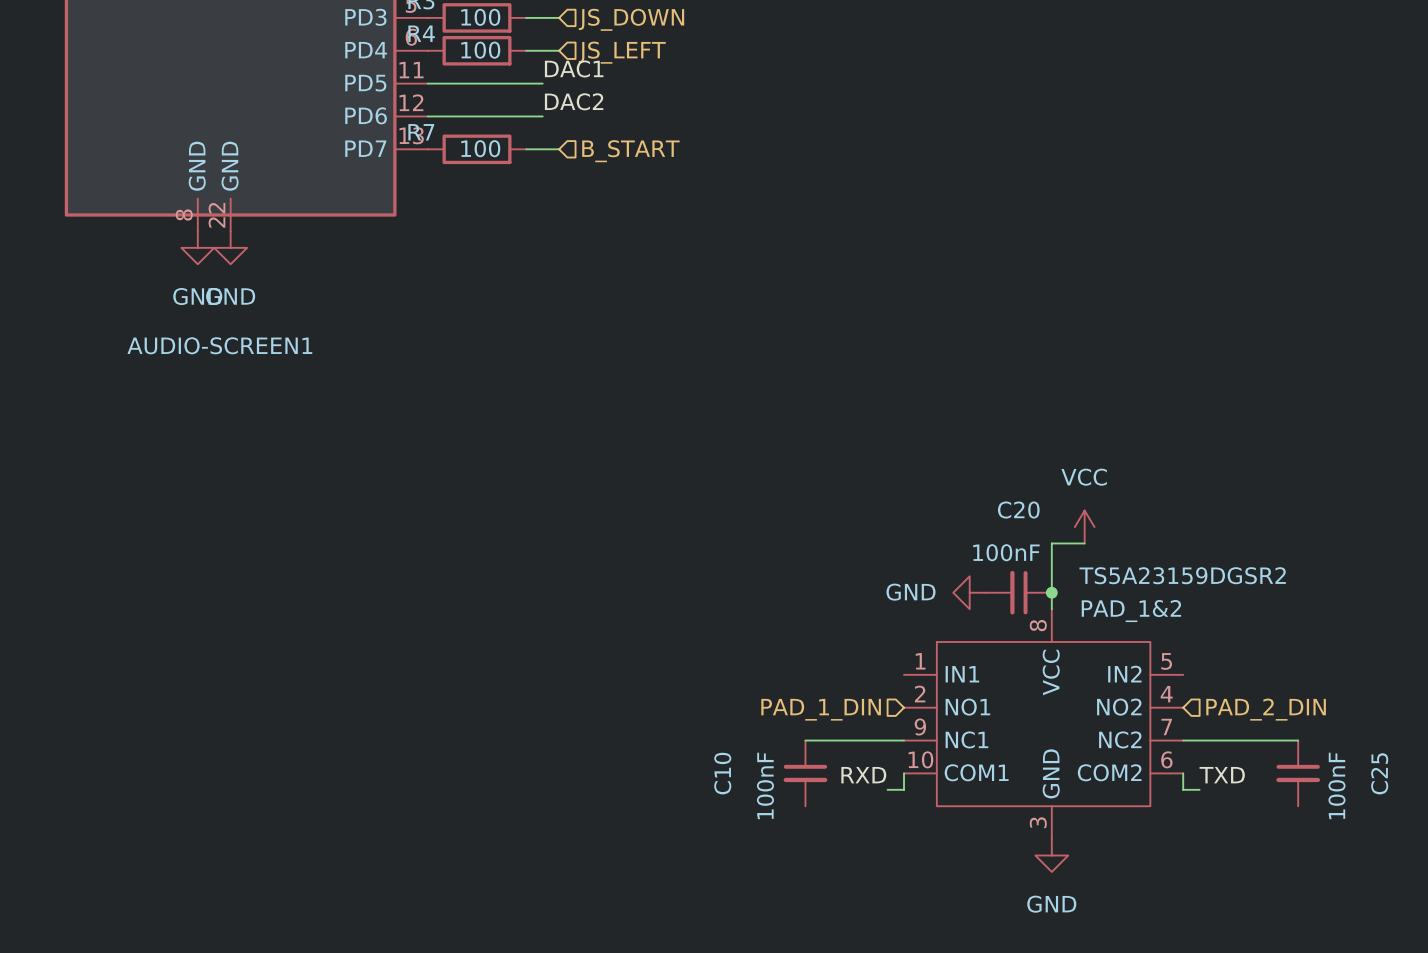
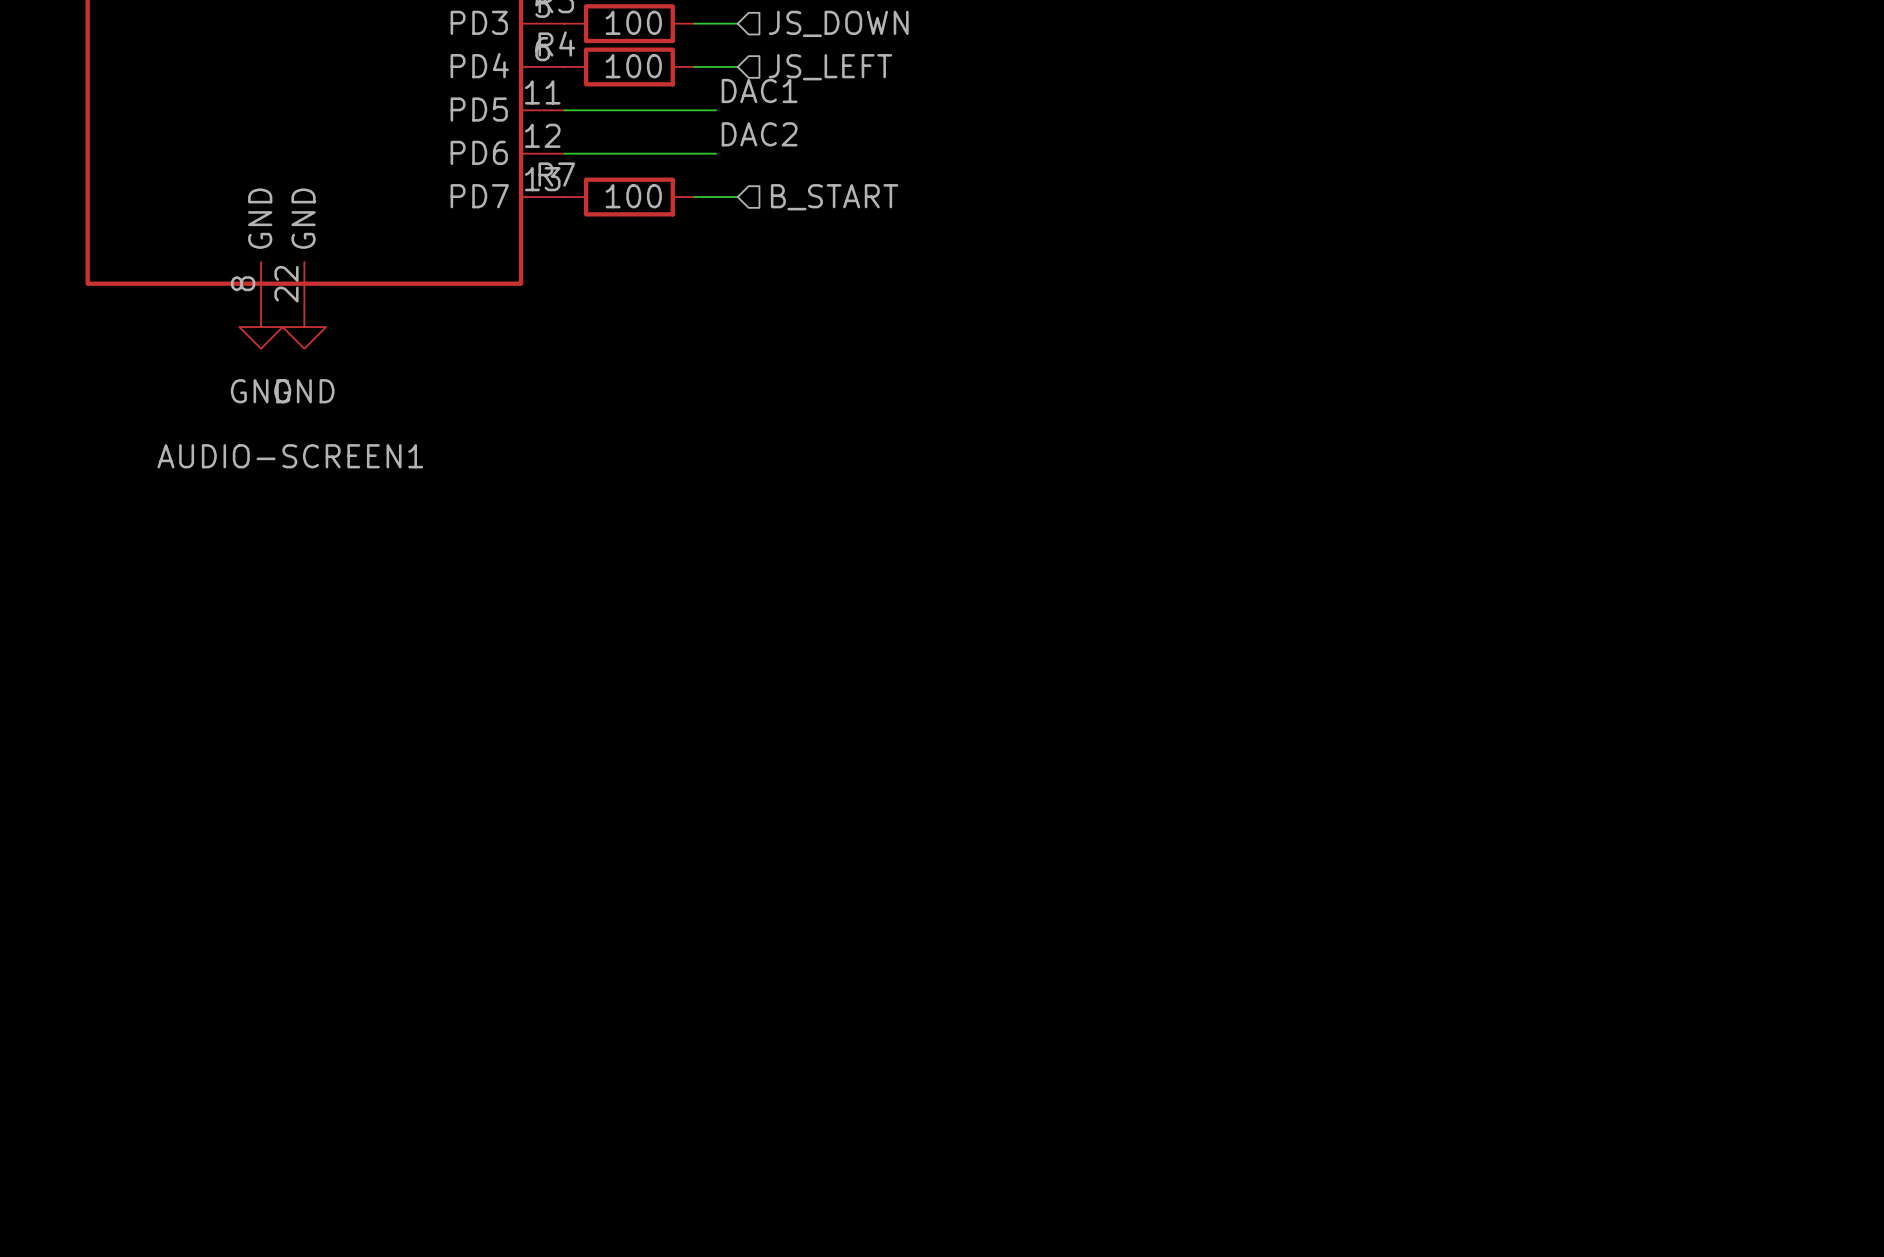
power symbol: VCC (1084, 527) -> none
wire: (1084, 543) (1051, 543) (1051, 609) -> none
power symbol: GND (969, 592) -> none
C20: 100nF (1018, 592) -> none
junction: (1051, 592) -> none
hierarchical label: PAD_1_DIN (821, 709) -> none
hierarchical label: PAD_2_DIN (1266, 709) -> none
TS5A23159DGSR2: PAD_1&2 (1043, 724) -> none
wire: (805, 740) (904, 740) -> none
wire: (1183, 740) (1298, 740) -> none
C10: 100nF (805, 773) -> none
wire: (904, 773) (904, 789) (887, 789) -> none
wire: (1183, 773) (1183, 789) (1199, 789) -> none
C25: 100nF (1298, 773) -> none
label: RXD (863, 775) -> none
label: TXD (1222, 775) -> none
power symbol: GND (1051, 855) -> none

